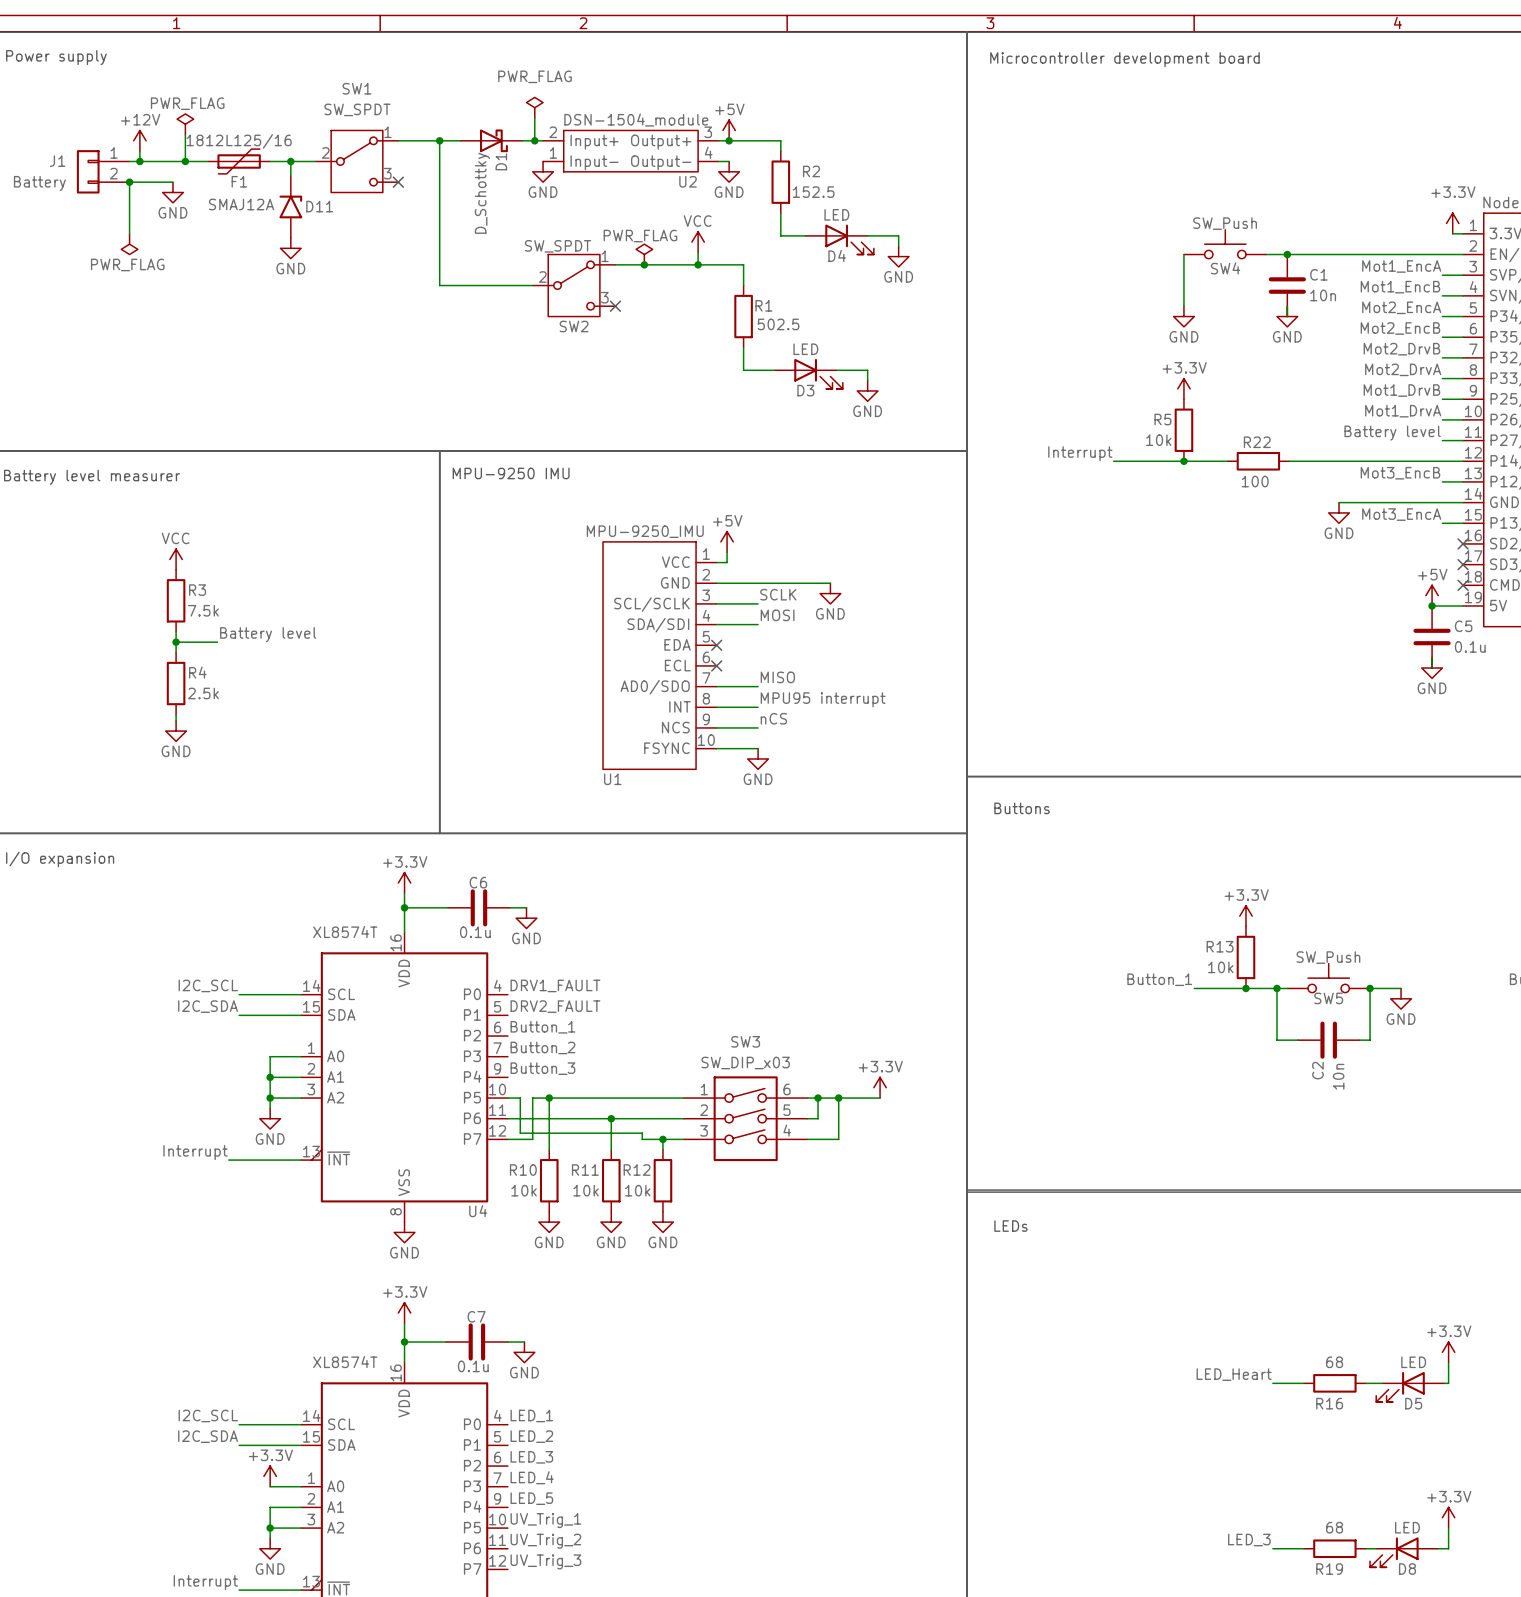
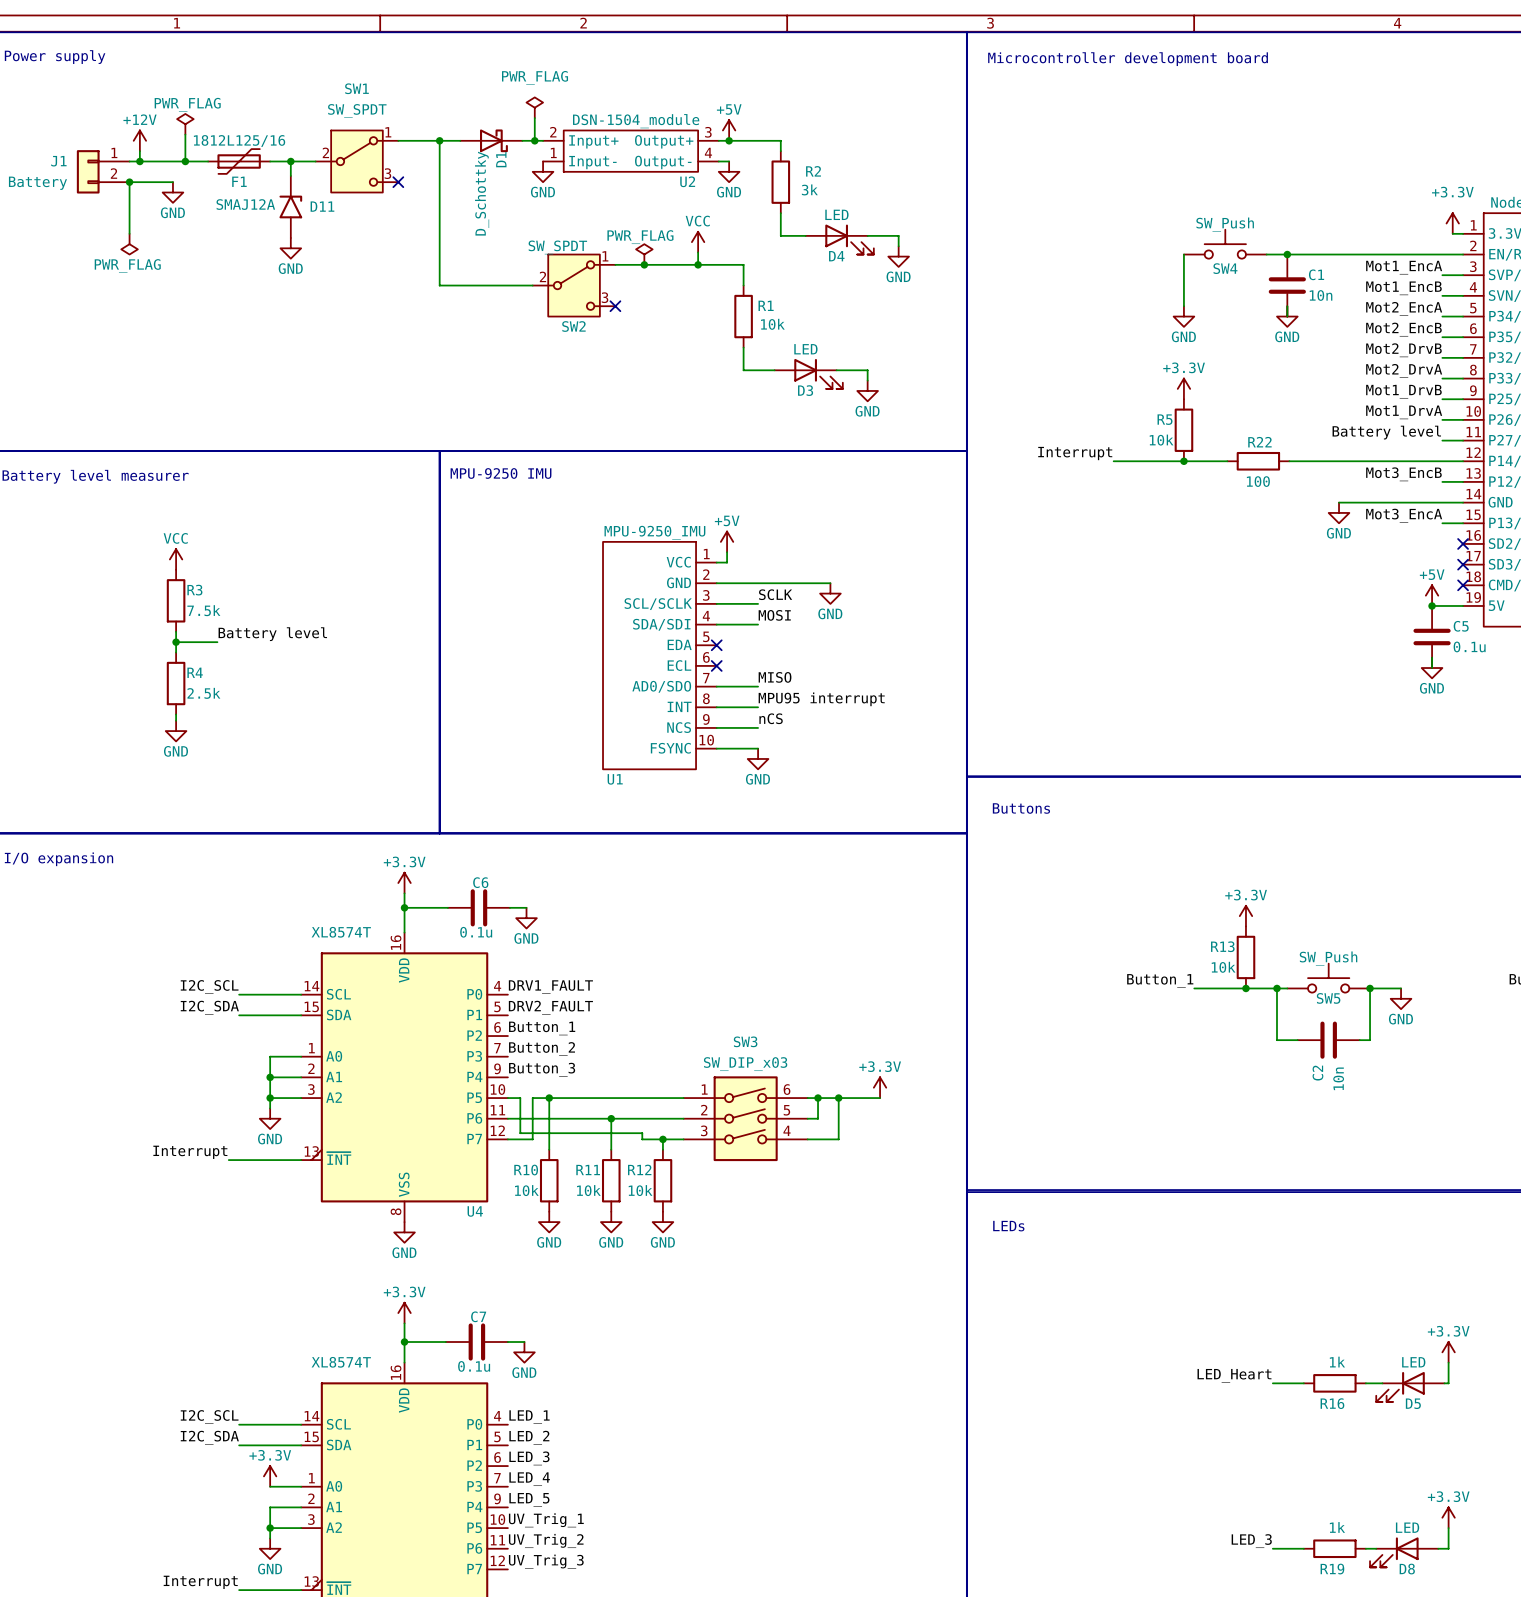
R2 value: 152.5 (813, 192) -> 3k (809, 189)
R1 value: 502.5 (778, 324) -> 10k (772, 324)
R16 value: 68 (1334, 1362) -> 1k (1337, 1362)
R19 value: 68 (1334, 1527) -> 1k (1337, 1527)

